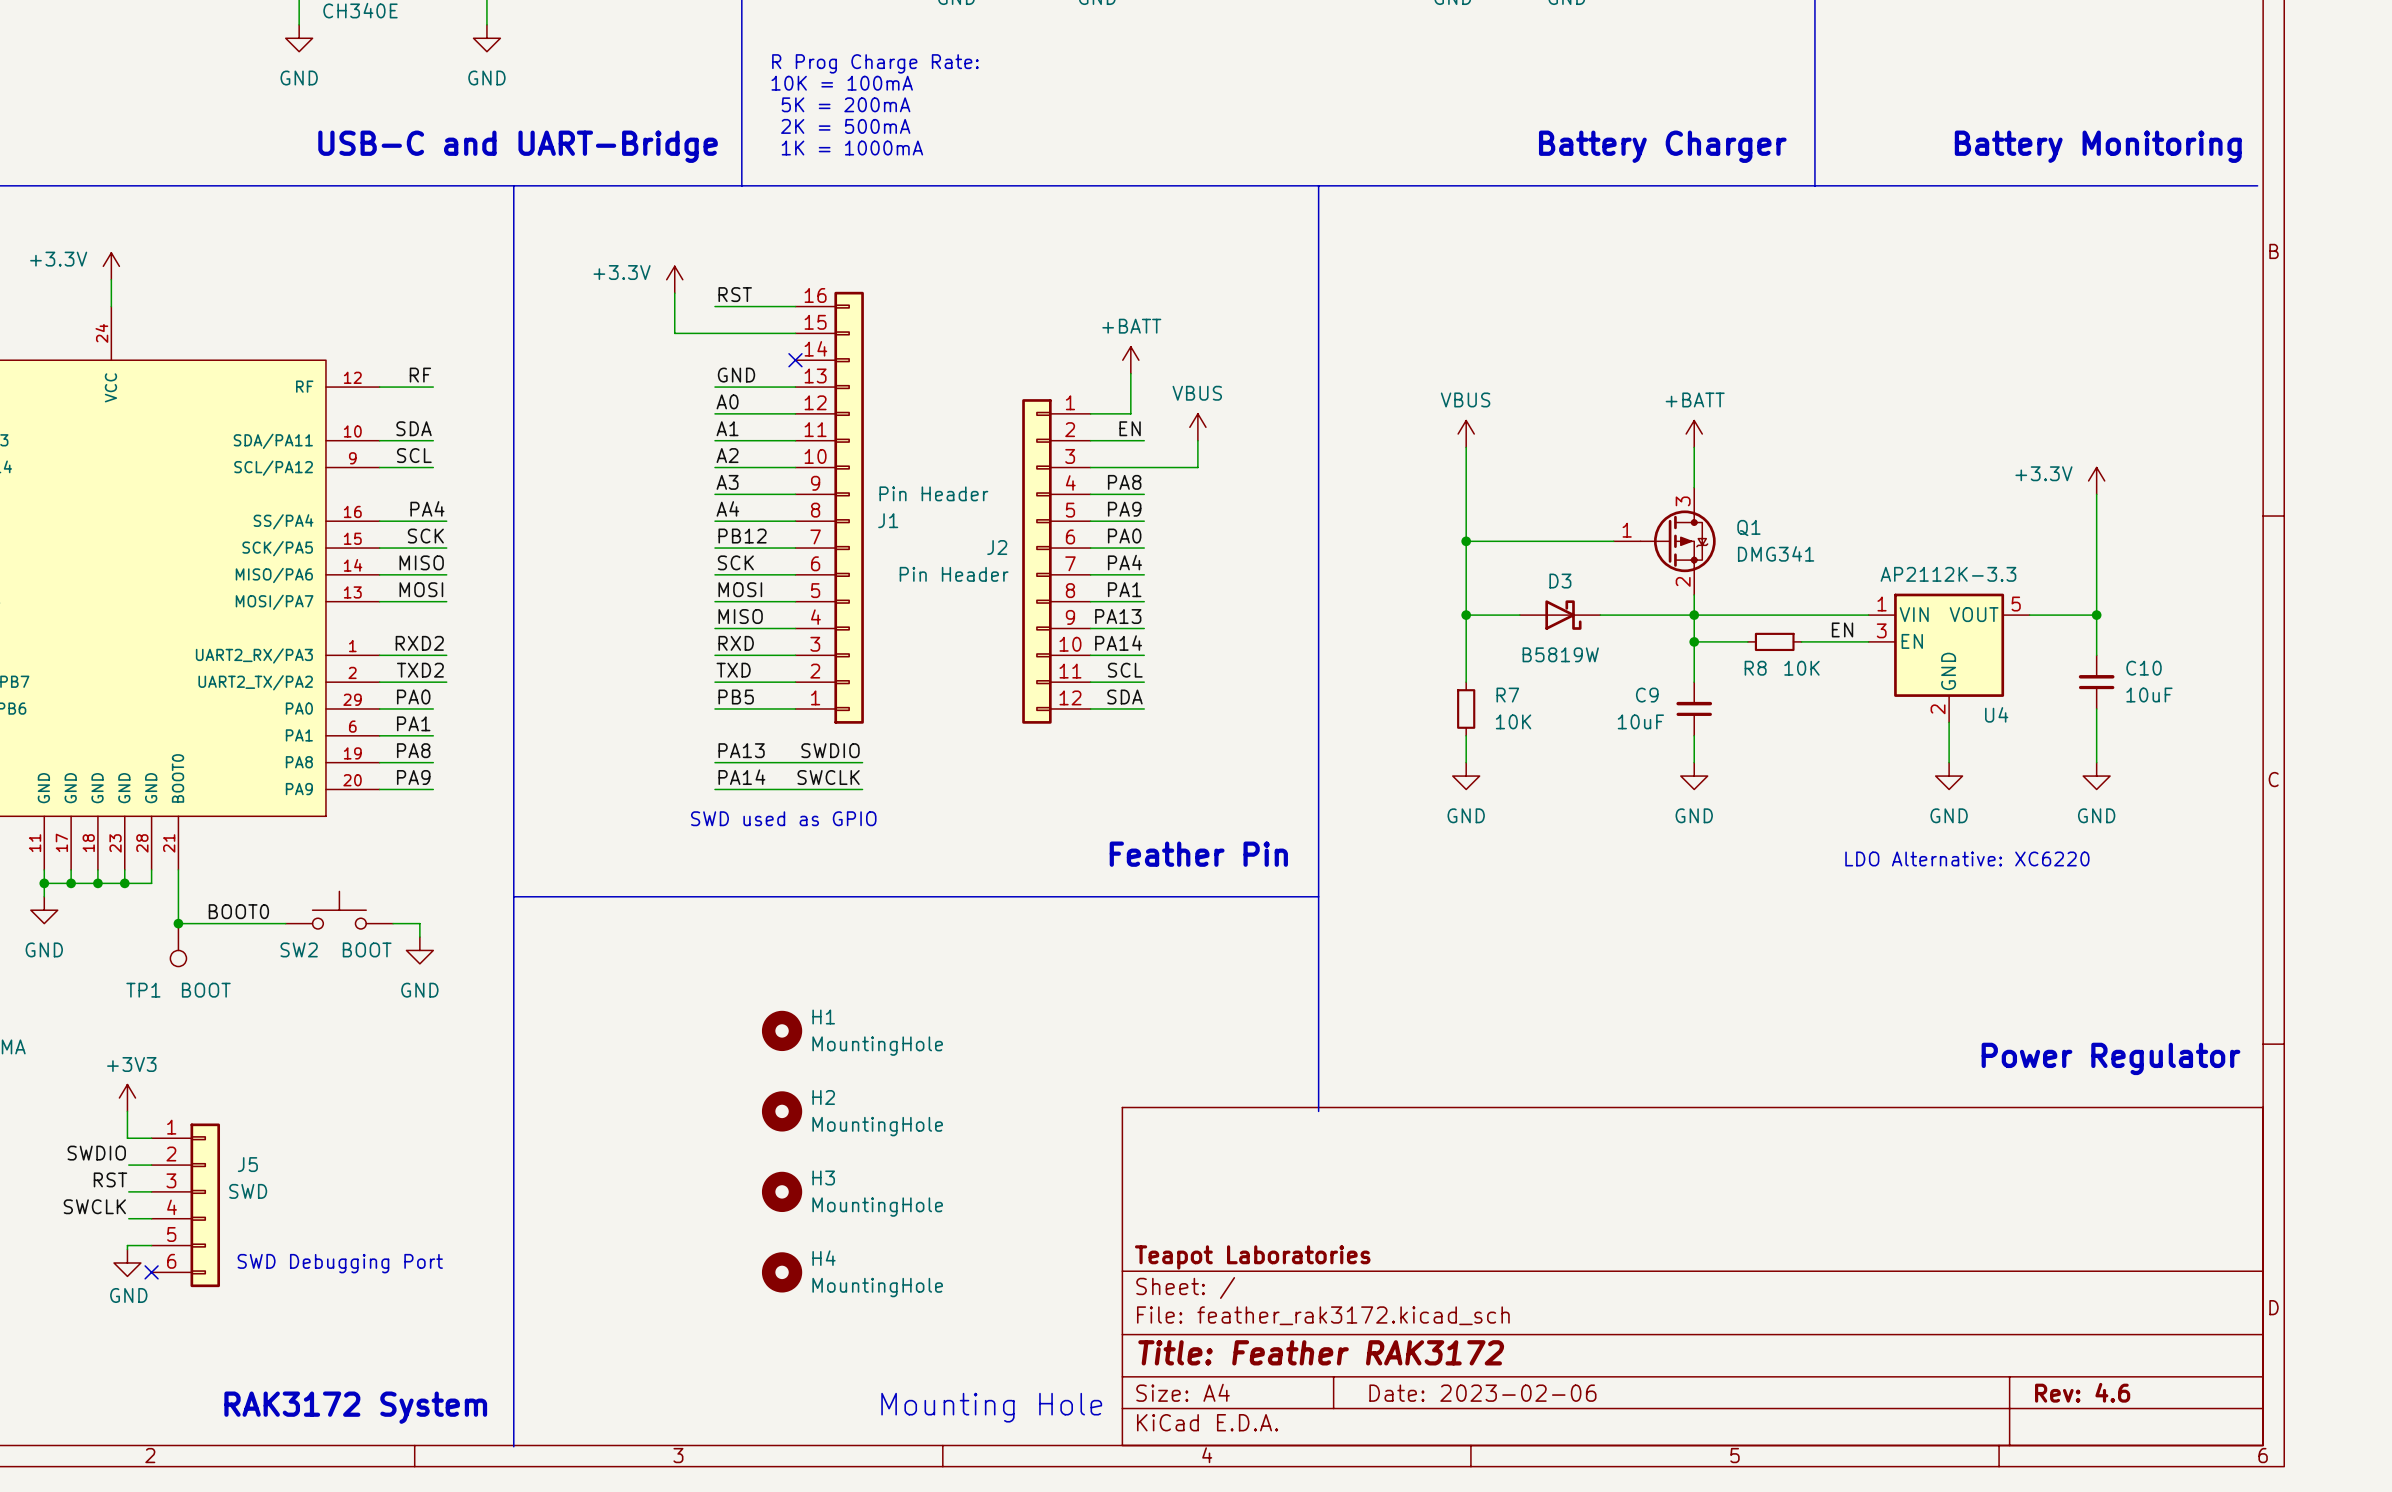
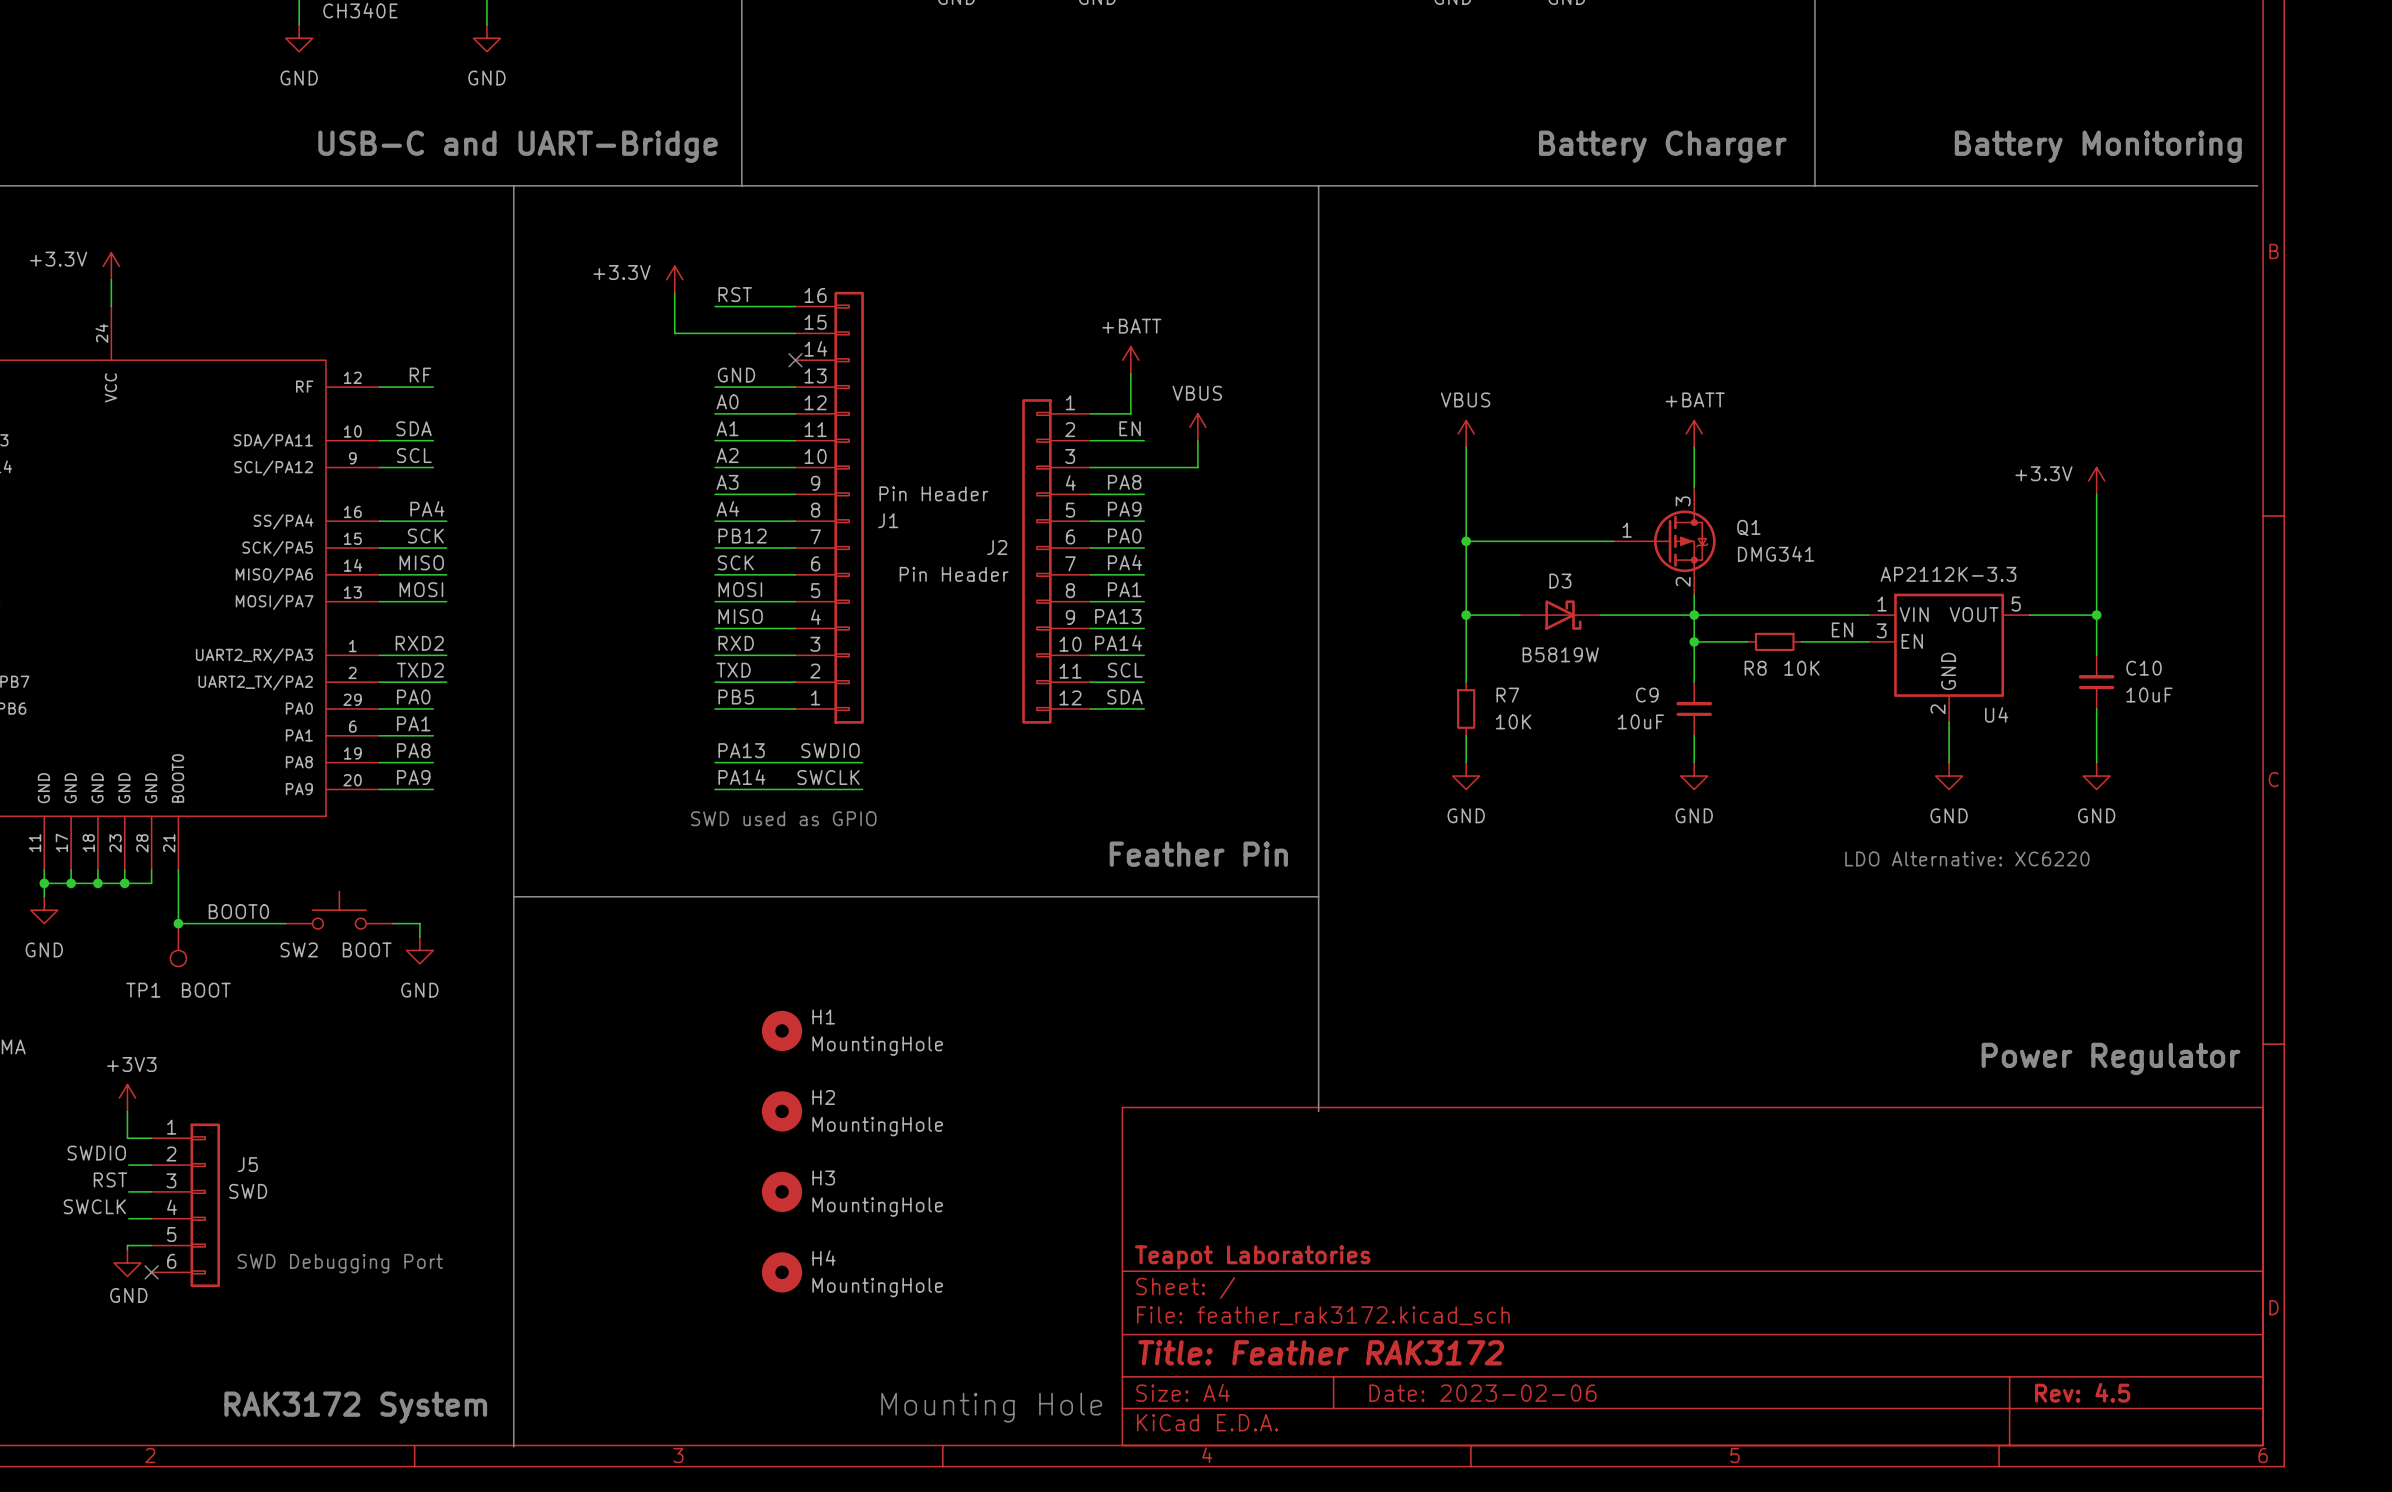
text: R Prog Charge Rate: (875, 63) -> none
text: 10K = 100mA (842, 83) -> none
text: 5K = 200mA (846, 104) -> none
text: 2K = 500mA (845, 126) -> none
text: 1K = 1000mA (852, 148) -> none
title block: Rev: 4.6 (2082, 1392) -> Rev: 4.5 (2082, 1392)

